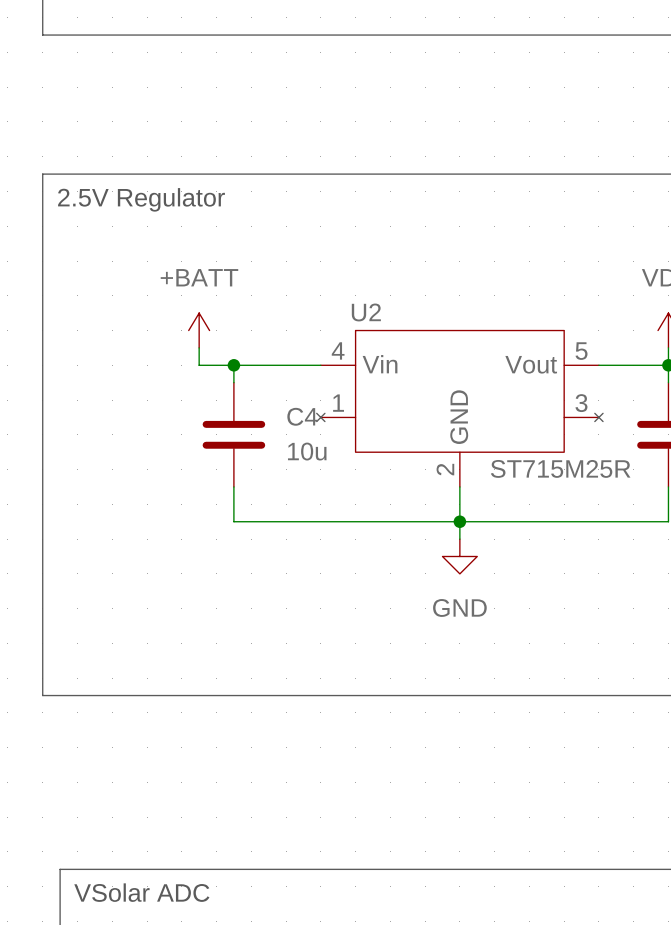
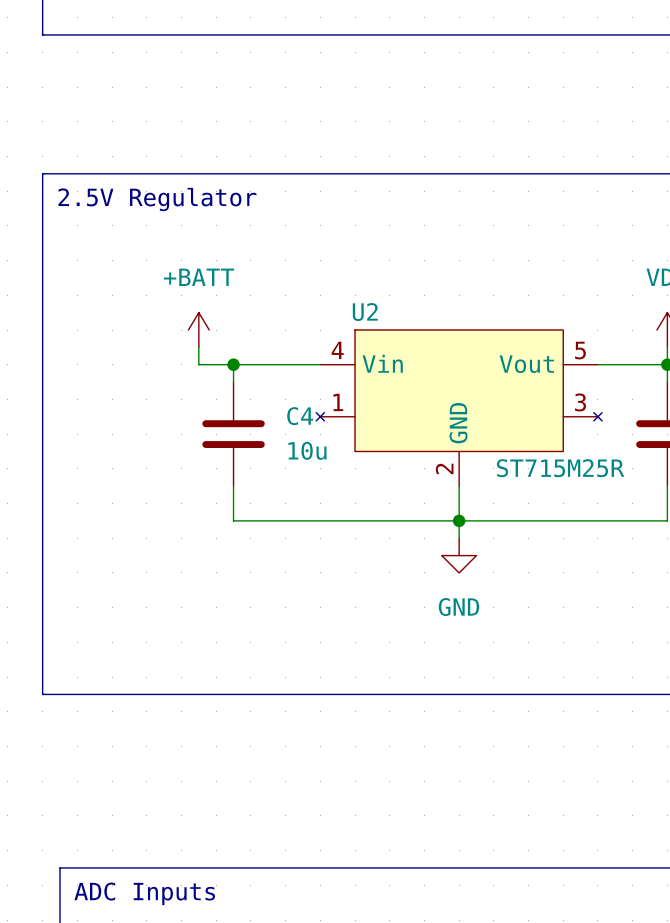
text: VSolar ADC (141, 892) -> ADC Inputs (144, 893)

